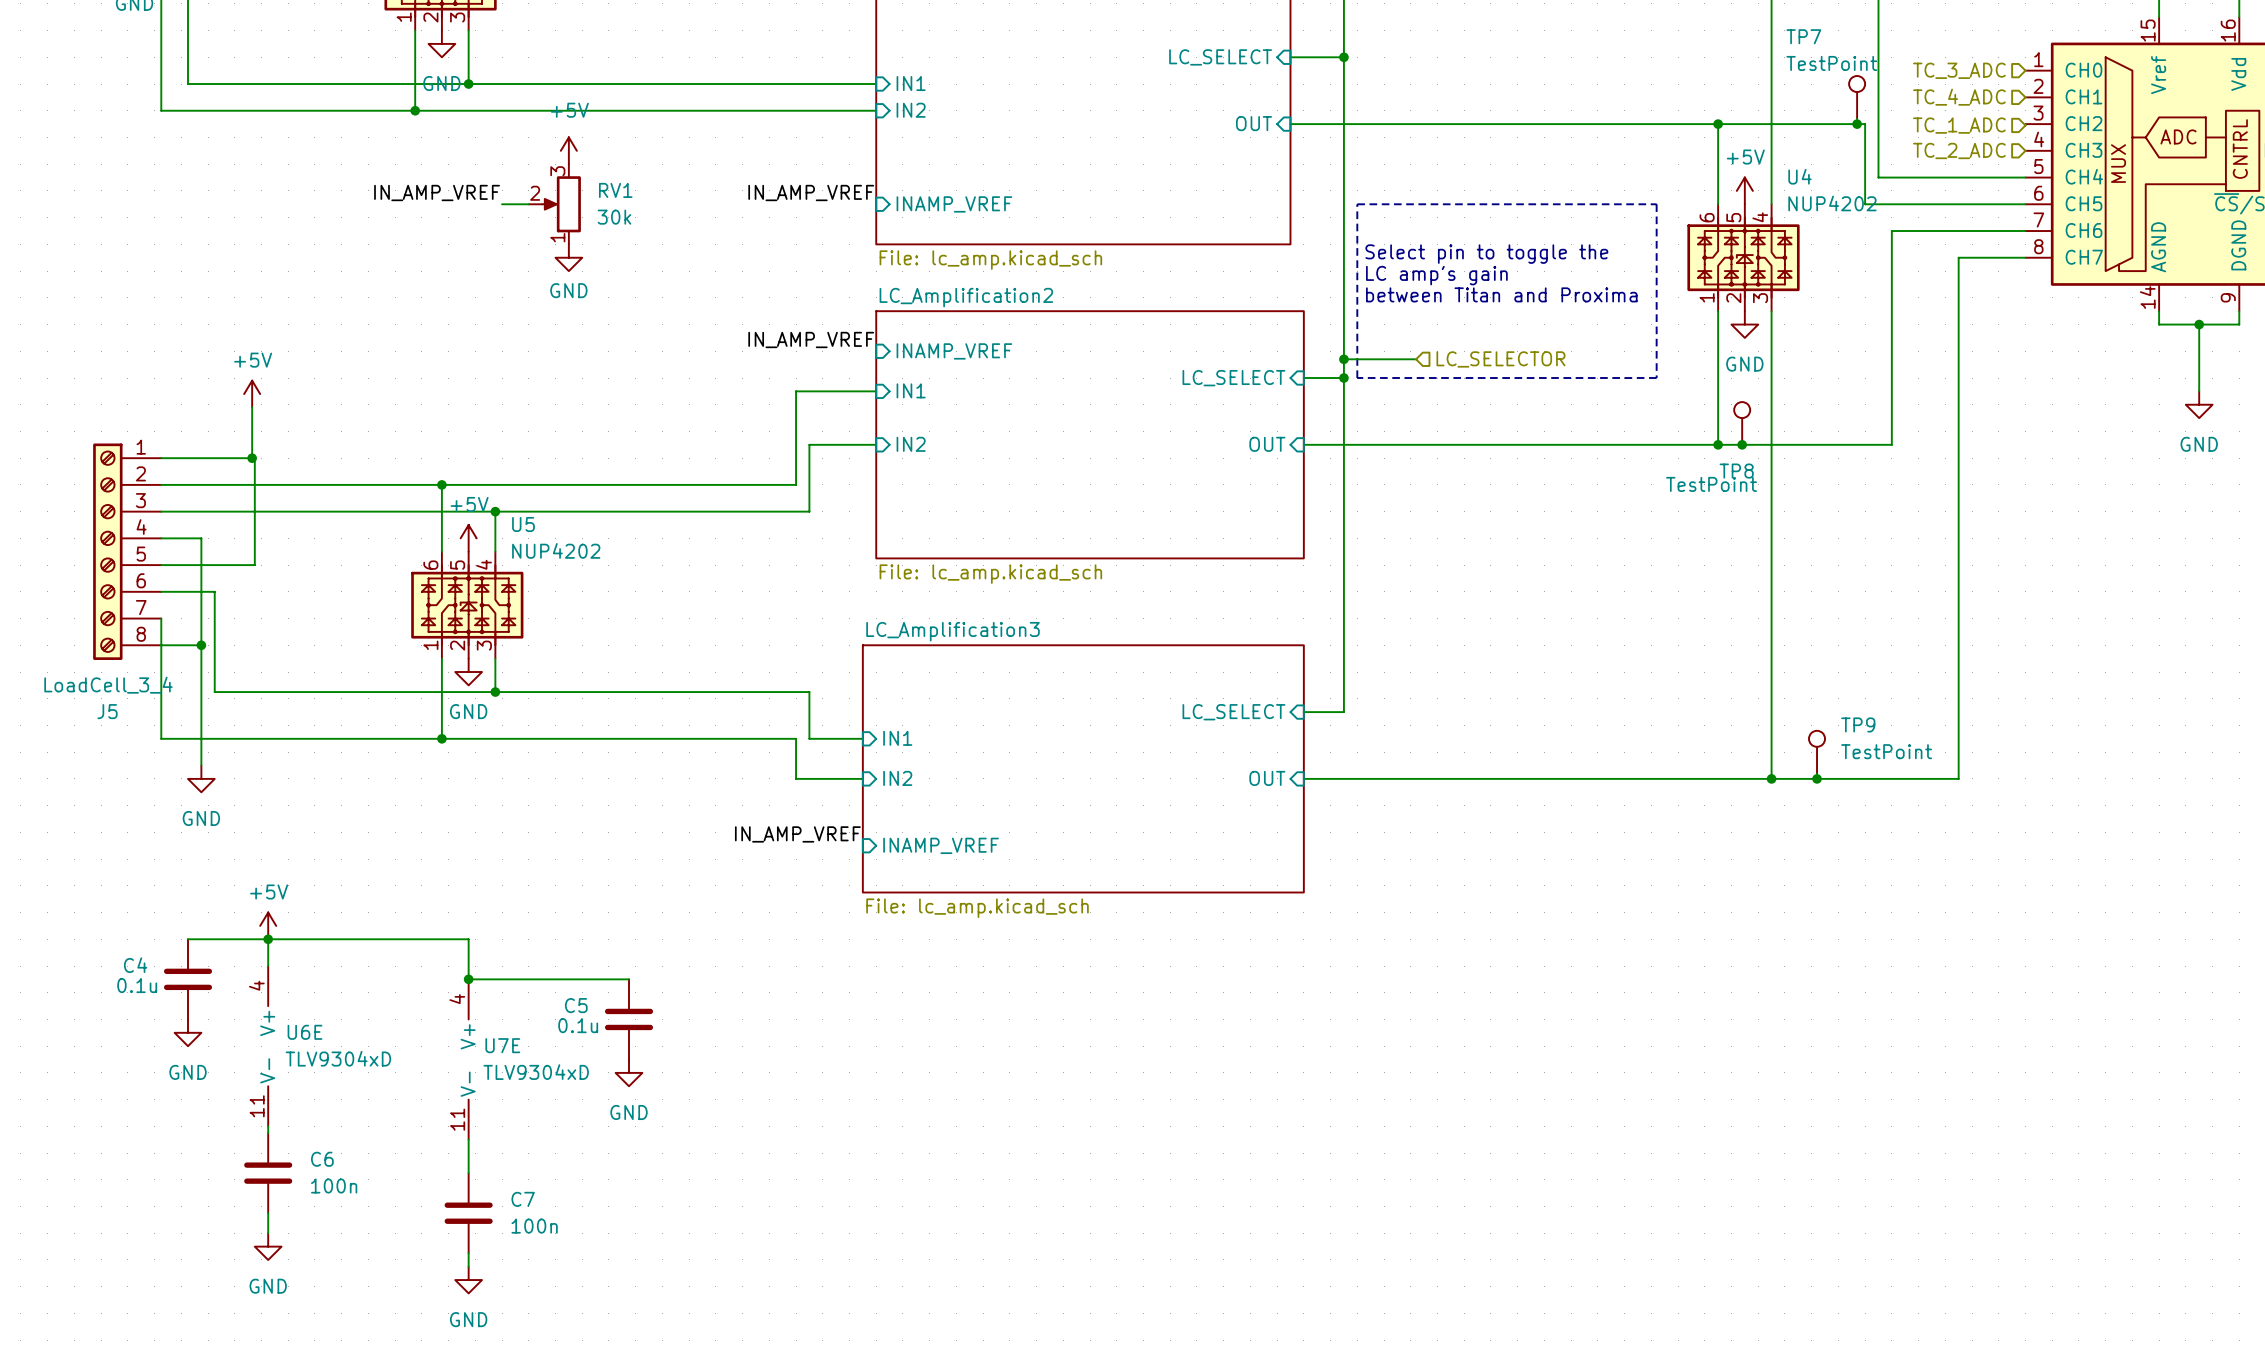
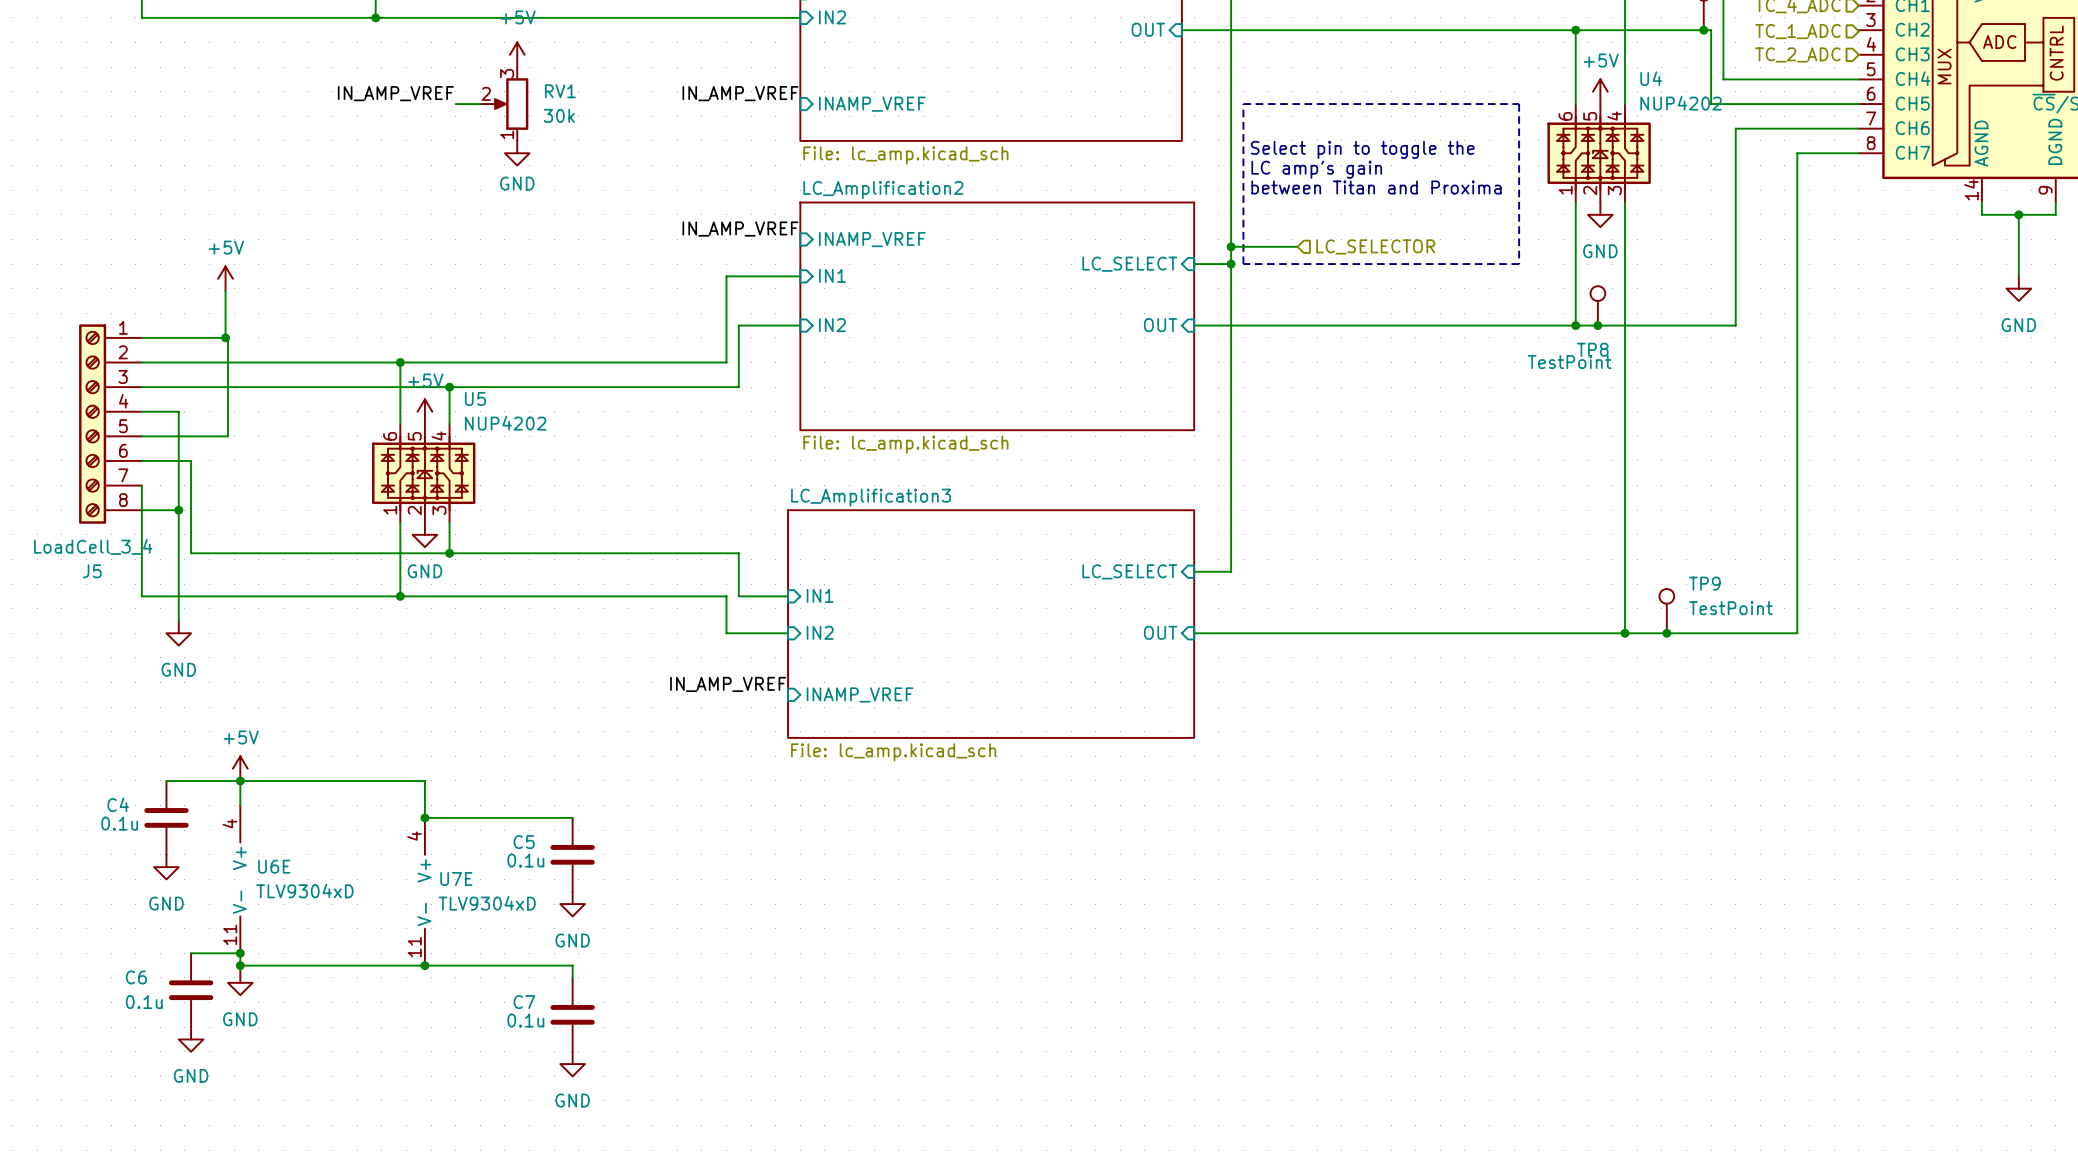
wire: none -> (191, 953) (240, 953)
junction: none -> (240, 953)
wire: none -> (240, 965) (572, 965) (572, 977)
junction: none -> (240, 965)
wire: (468, 1139) (468, 1173) -> none
junction: none -> (424, 965)
power symbol: none -> GND (240, 982)
C6 name position: C6 (322, 1159) -> C6 (136, 977)
C6 position: (268, 1173) -> (191, 990)
C6 value: 100n (334, 1185) -> 0.1u (144, 1002)
C7 name position: C7 (523, 1199) -> C7 (524, 1002)
wire: (268, 1213) (268, 1233) -> none
C7 position: (468, 1213) -> (572, 1014)
power symbol: none -> GND (191, 1039)
C7 value: 100n (534, 1226) -> 0.1u (525, 1020)
power symbol: GND (268, 1246) -> none
power symbol: none -> GND (572, 1064)
wire: (468, 1253) (468, 1266) -> none
power symbol: GND (468, 1280) -> none

